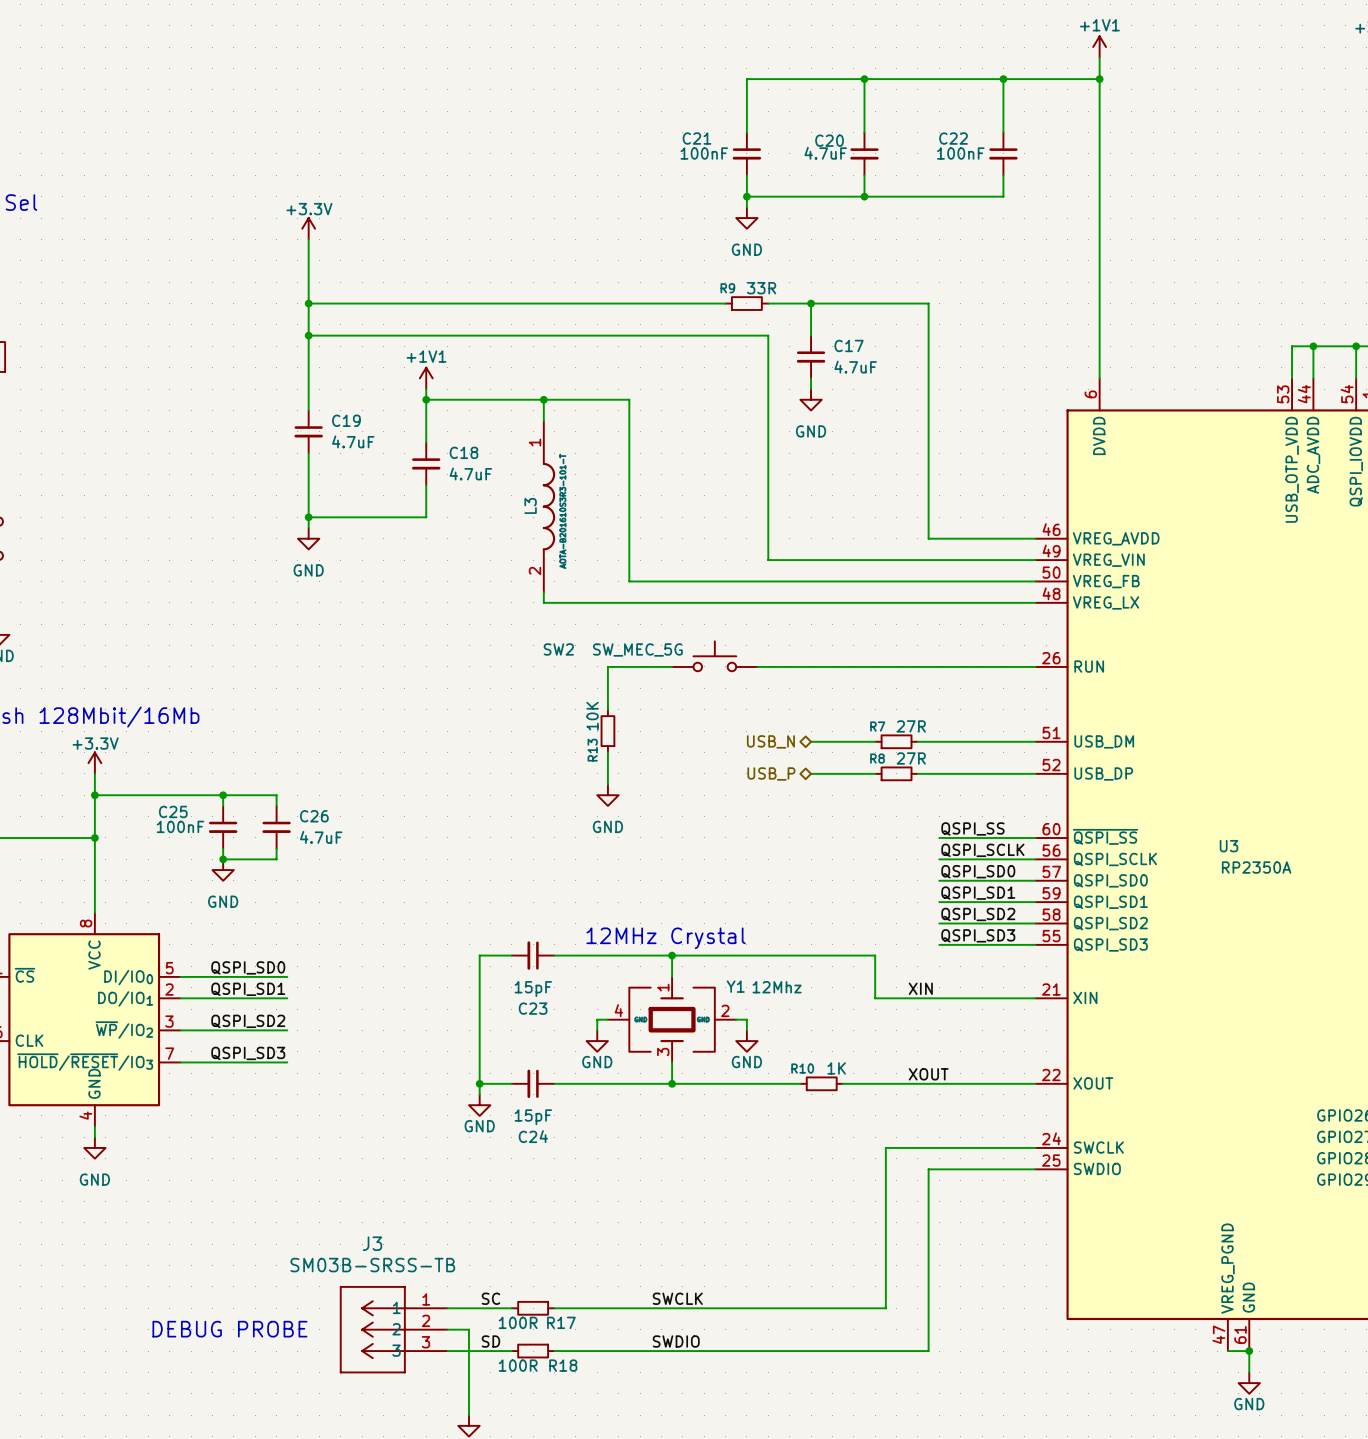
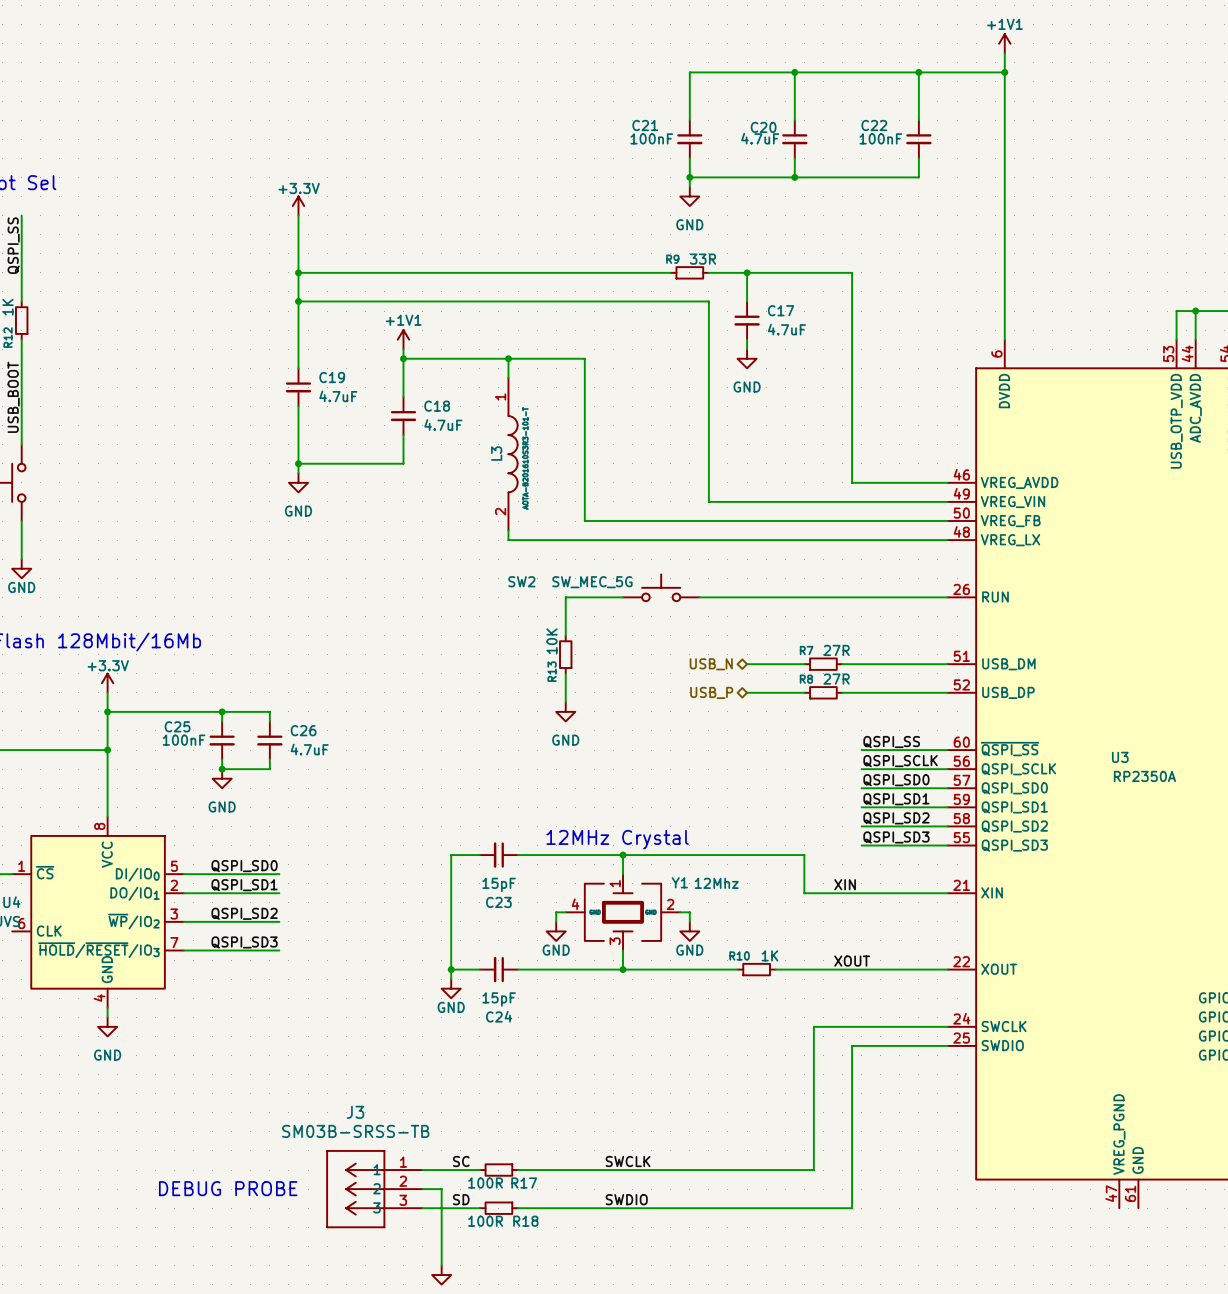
wire: (1227, 1351) (1249, 1351) (1249, 1372) -> none
junction: (1249, 1351) -> none
power symbol: GND (1249, 1383) -> none

